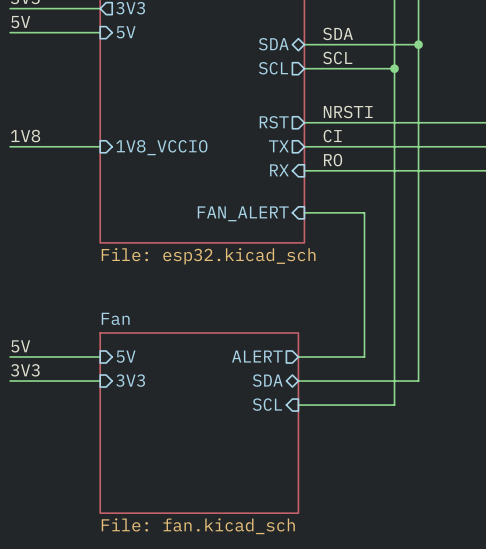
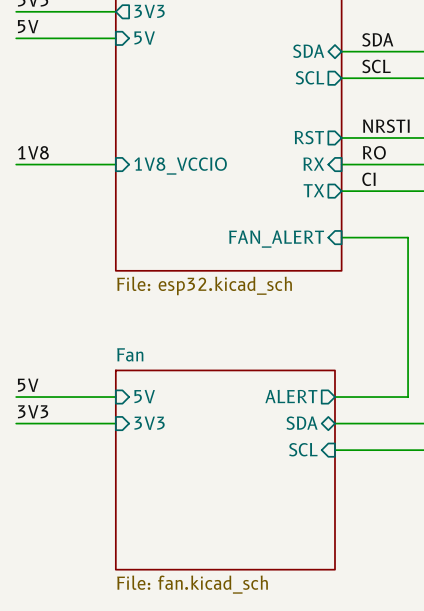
label: CI (332, 136) -> RO (374, 152)
sheet pin shape: output (278, 146) -> input (313, 164)
sheet pin: TX (278, 146) -> RX (313, 164)
label: RO (333, 160) -> CI (368, 179)
sheet pin shape: input (279, 170) -> output (313, 190)
sheet pin: RX (279, 170) -> TX (313, 190)

